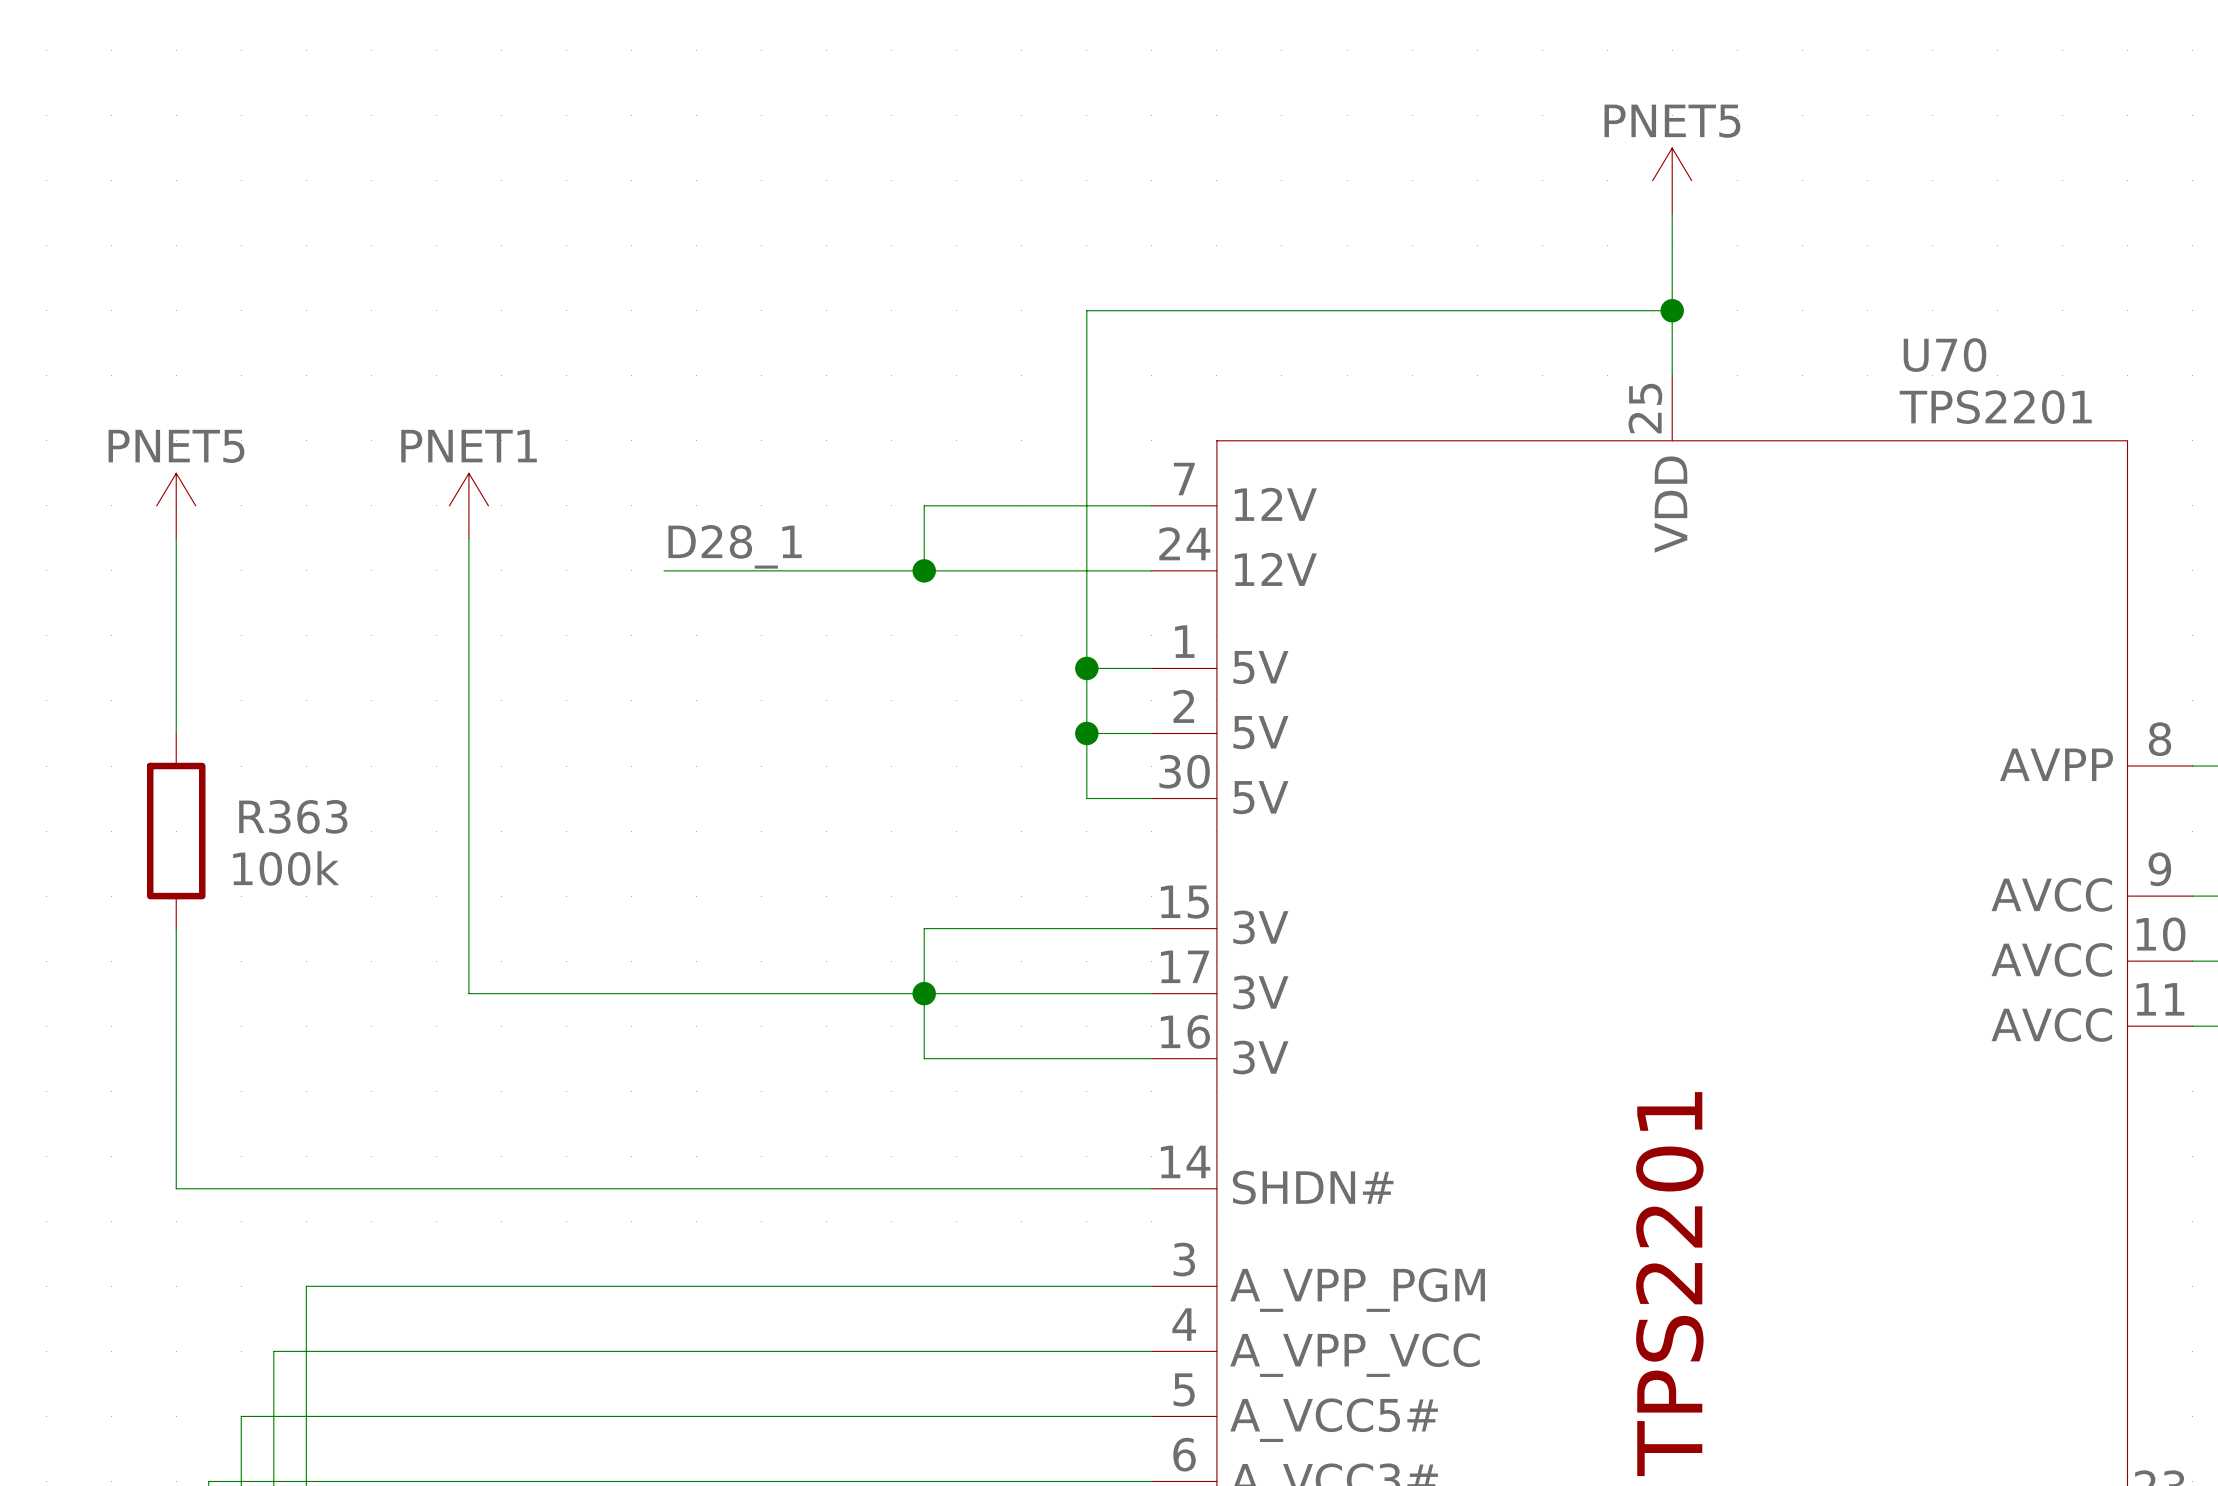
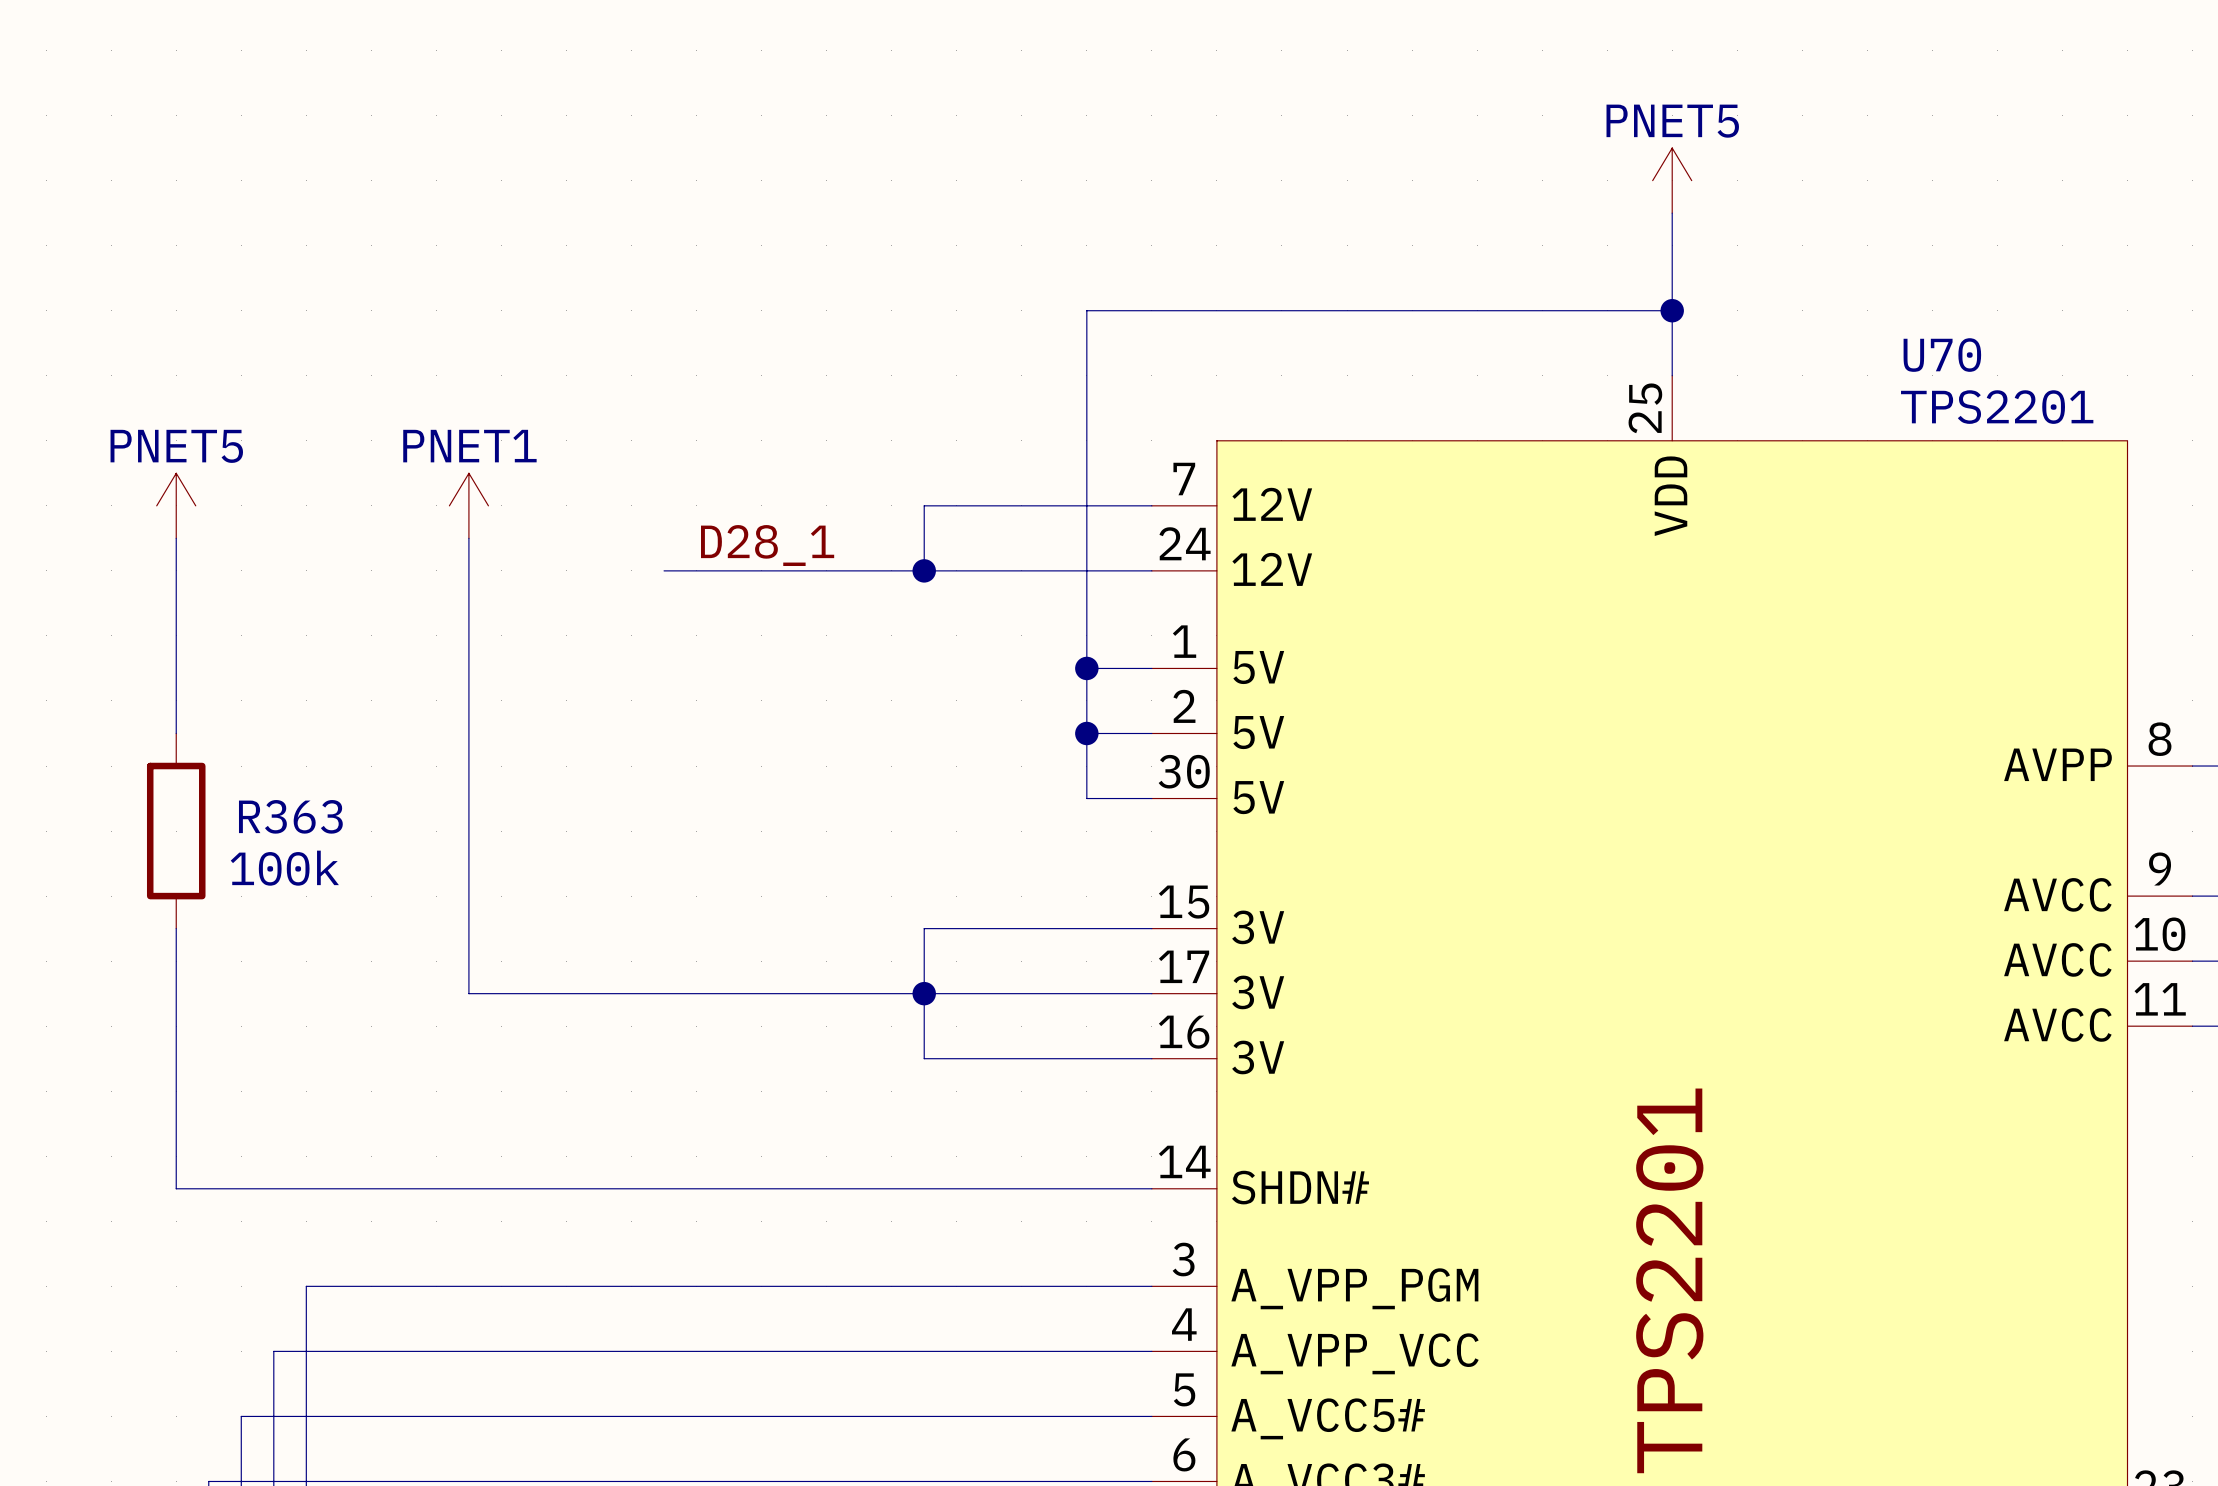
label position: D28_1 (735, 546) -> D28_1 (767, 545)

